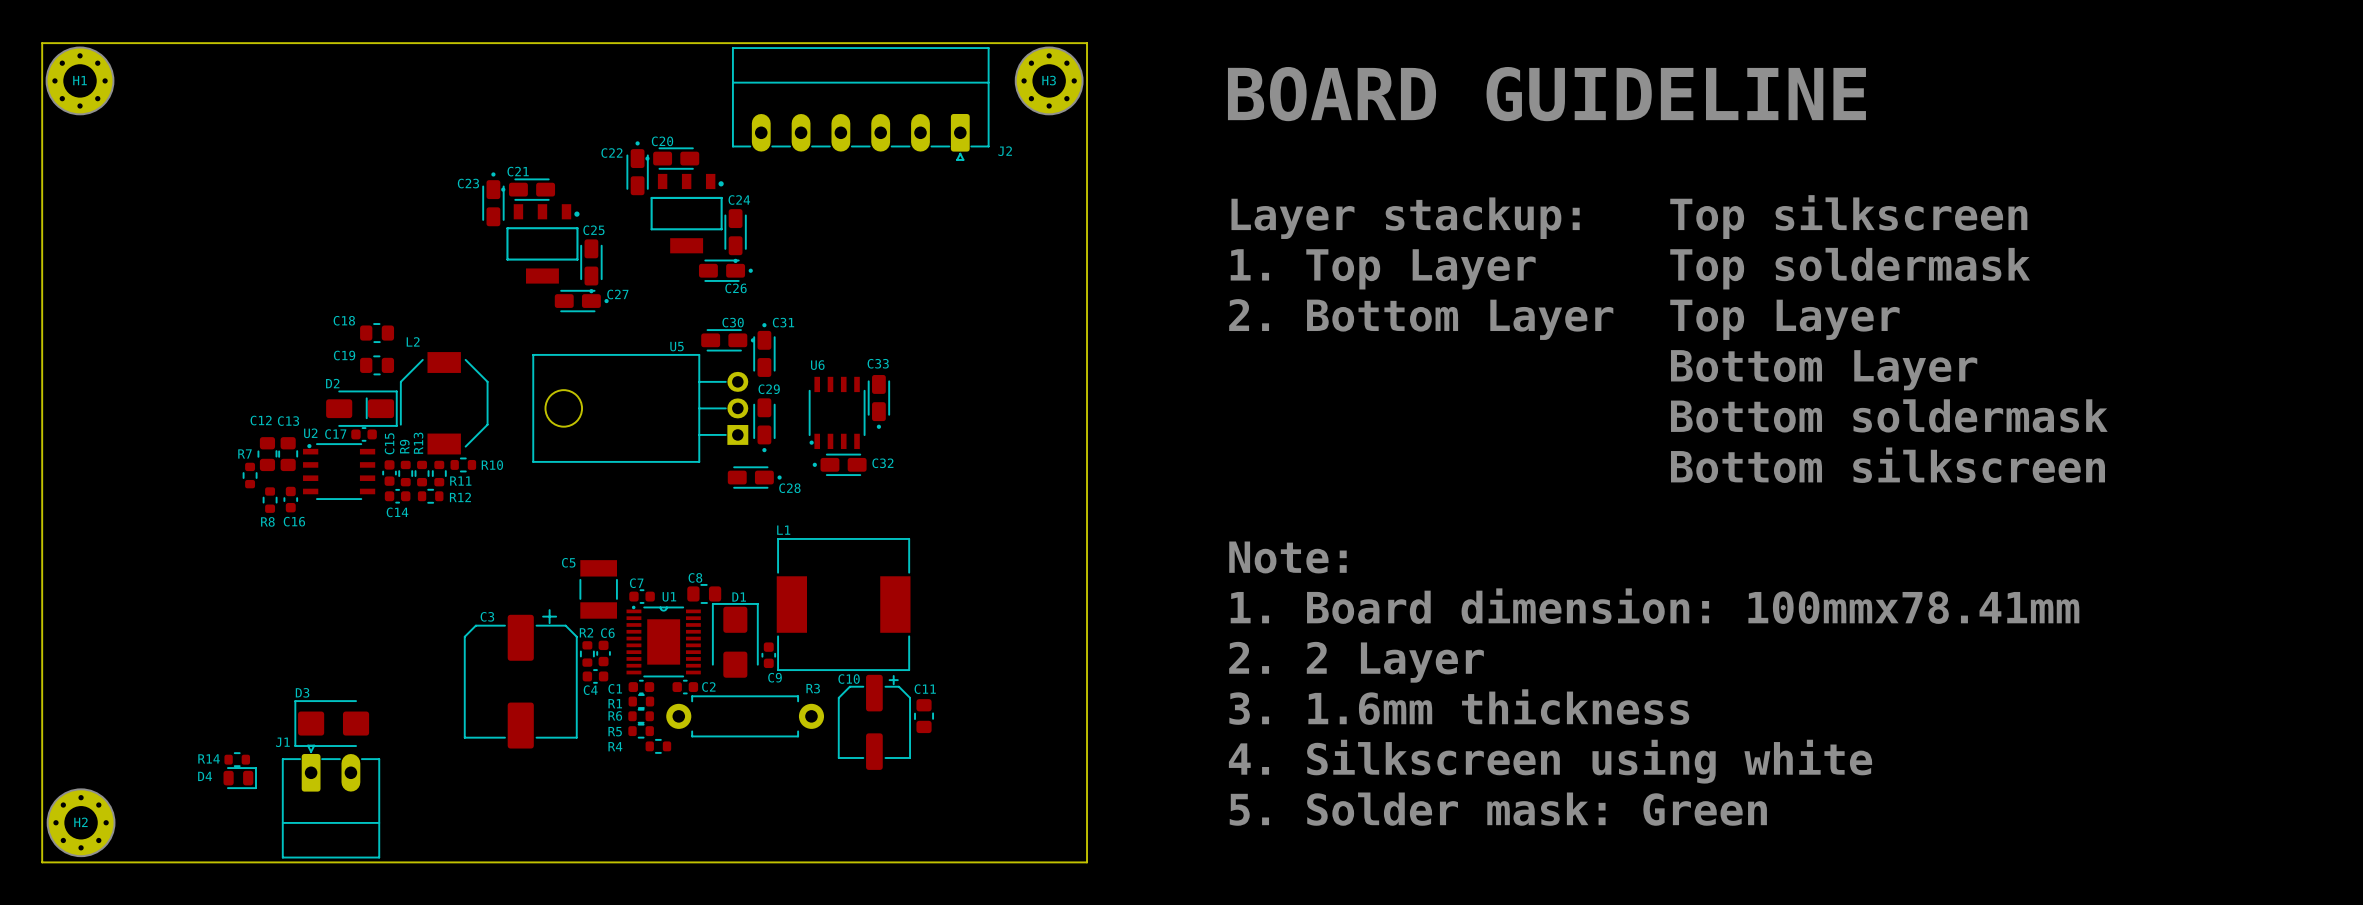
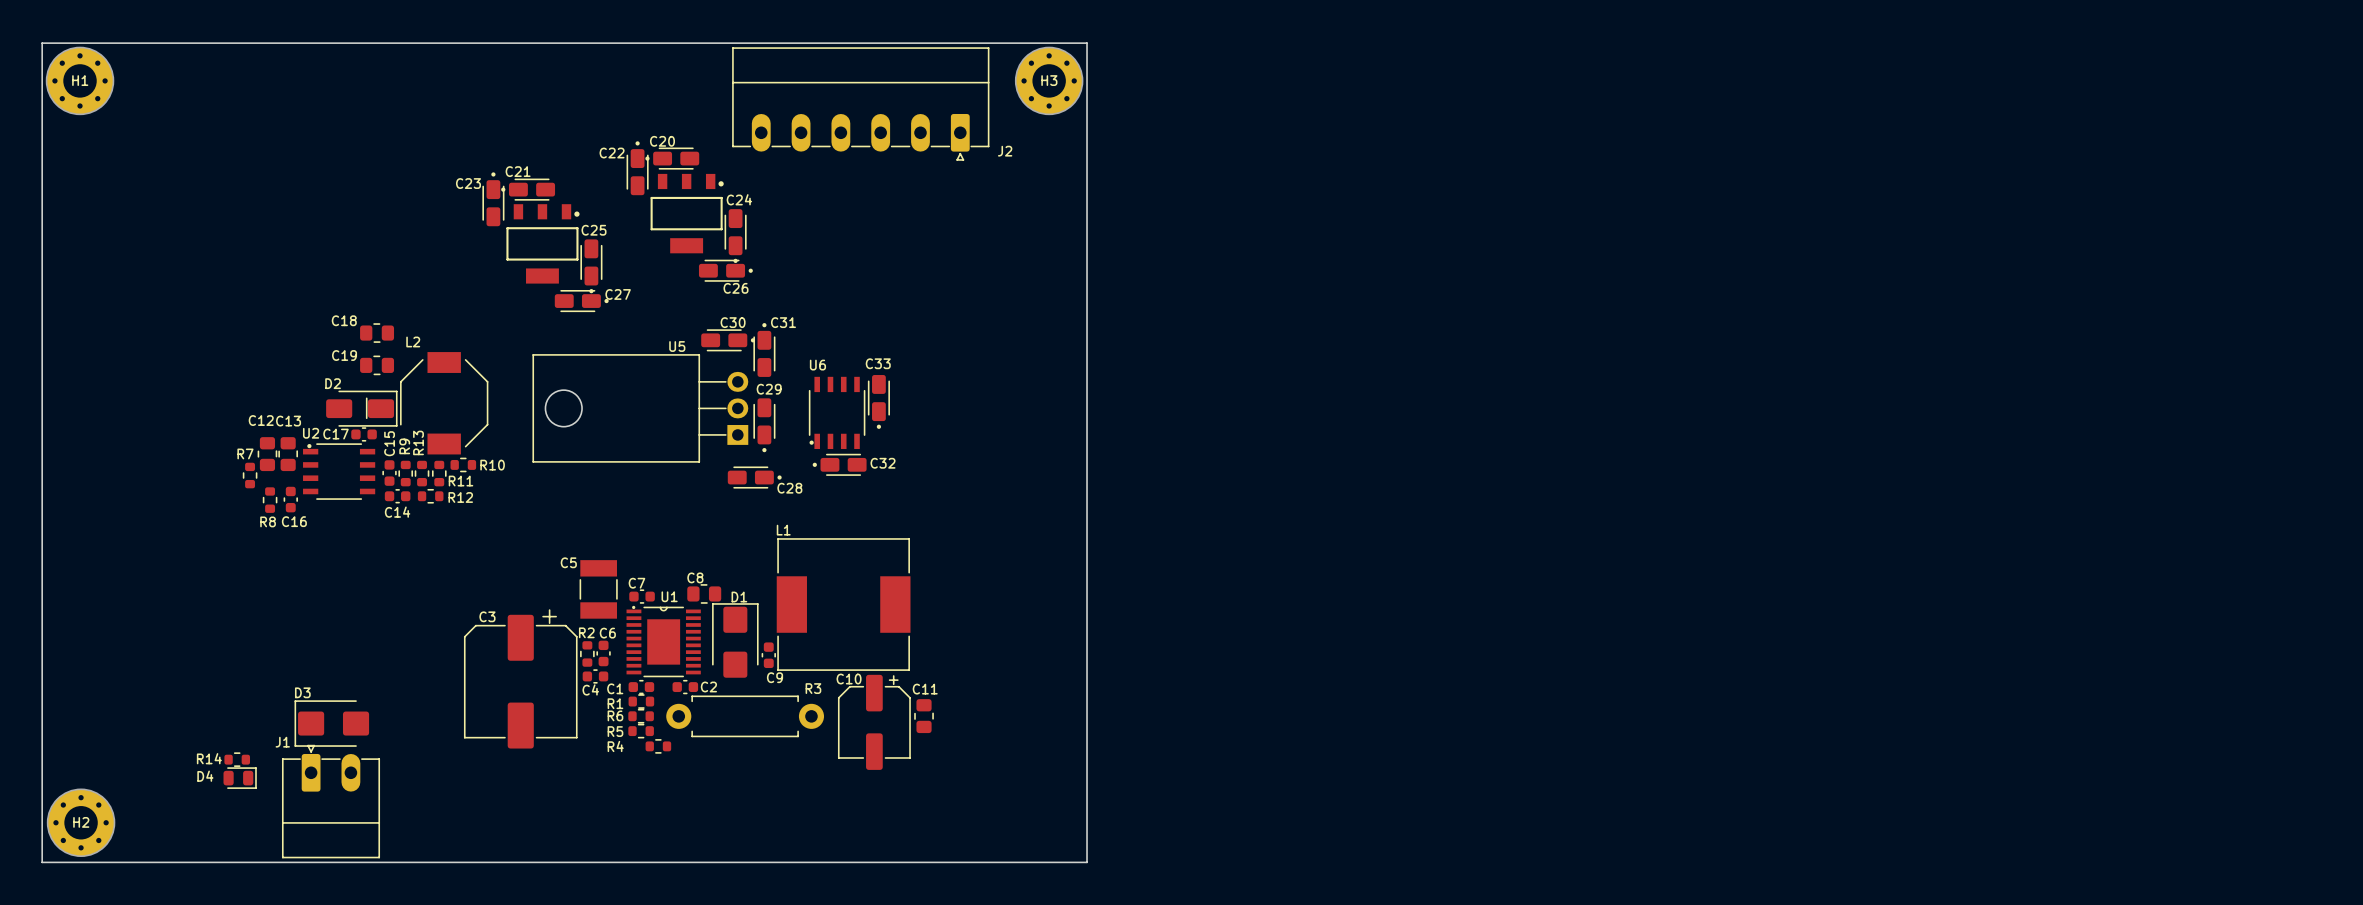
text: BOARD GUIDELINE (1546, 94) -> none
text: Top silkscreen (1848, 217) -> none
text: Layer stackup: (1405, 218) -> none
text: Top soldermask (1850, 268) -> none
text: 1. Top Layer (1383, 269) -> none
text: 2. Bottom Layer (1421, 319) -> none
text: Top Layer (1784, 319) -> none
text: Bottom Layer (1824, 370) -> none
text: Bottom soldermask (1889, 415) -> none
text: Bottom silkscreen (1887, 465) -> none
text: Note: (1287, 557) -> none
text: 1. Board dimension: 100mmx78.41mm (1655, 606) -> none
text: 2. 2 Layer (1356, 662) -> none
text: 3. 1.6mm thickness (1459, 707) -> none
text: 4. Silkscreen using white (1550, 761) -> none
text: 5. Solder mask: Green (1498, 809) -> none

